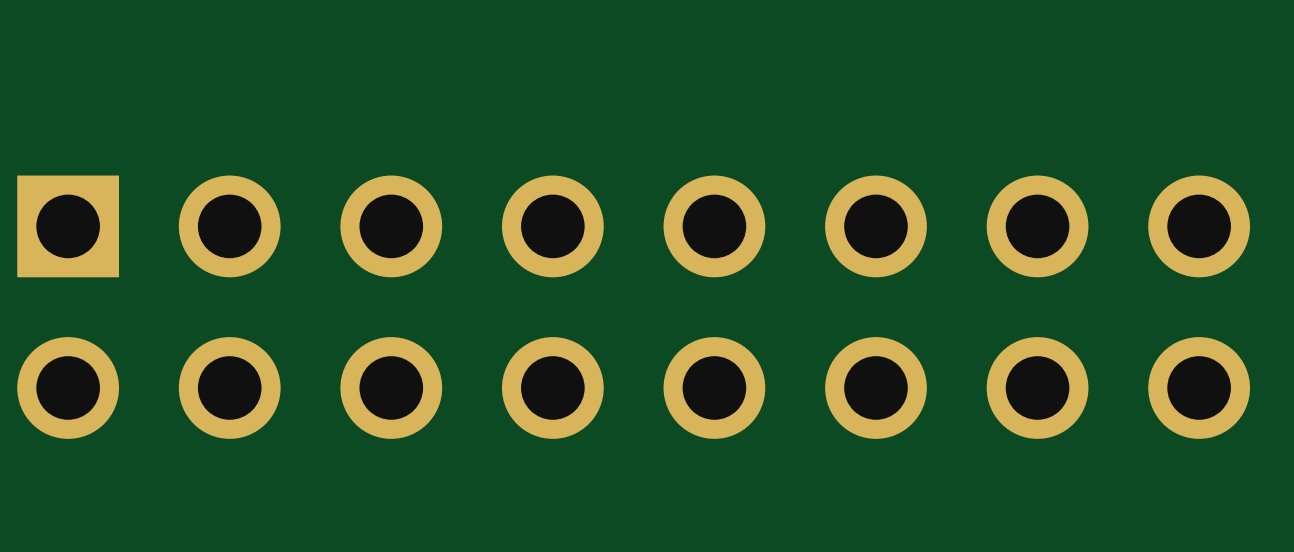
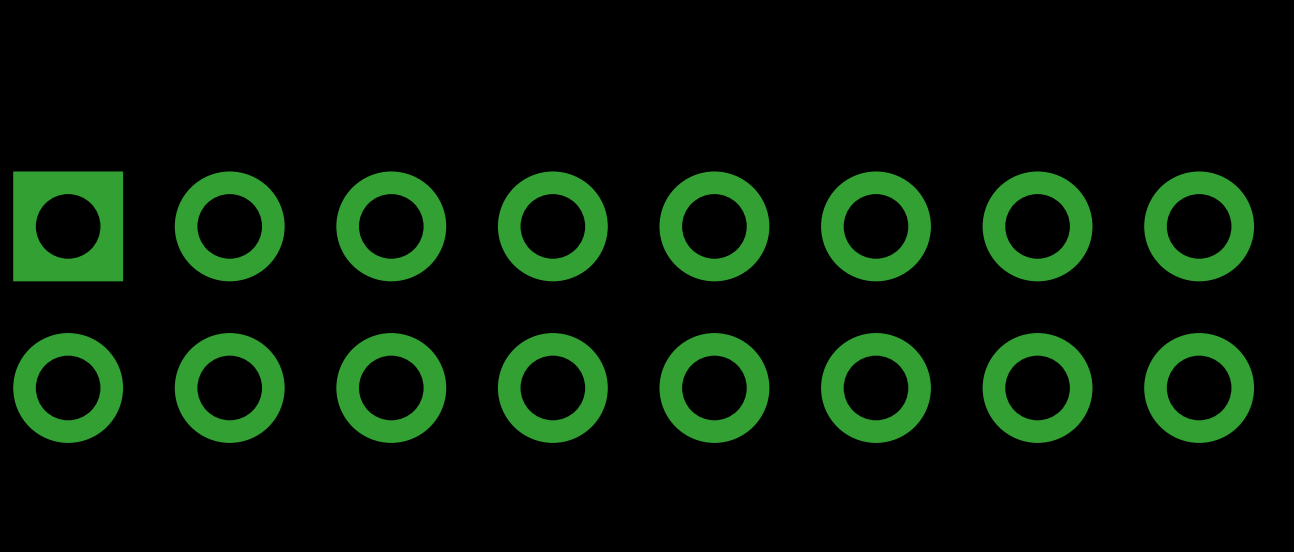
part footprint: [17, 175, 1251, 439] -> [13, 171, 1255, 443]

